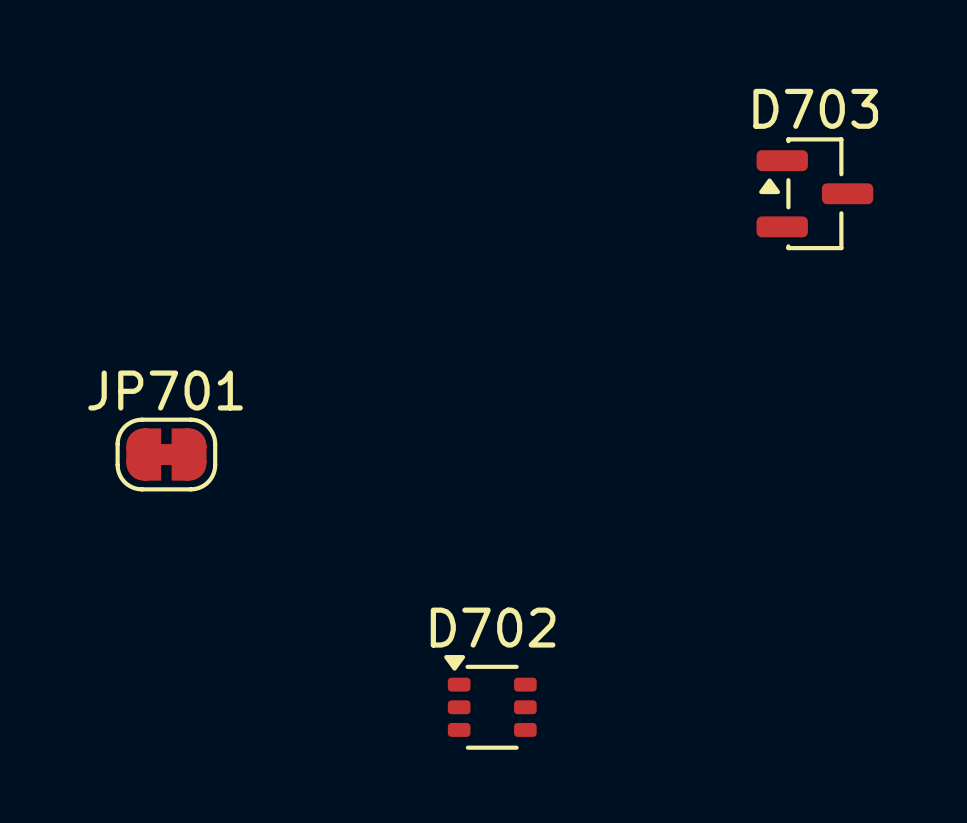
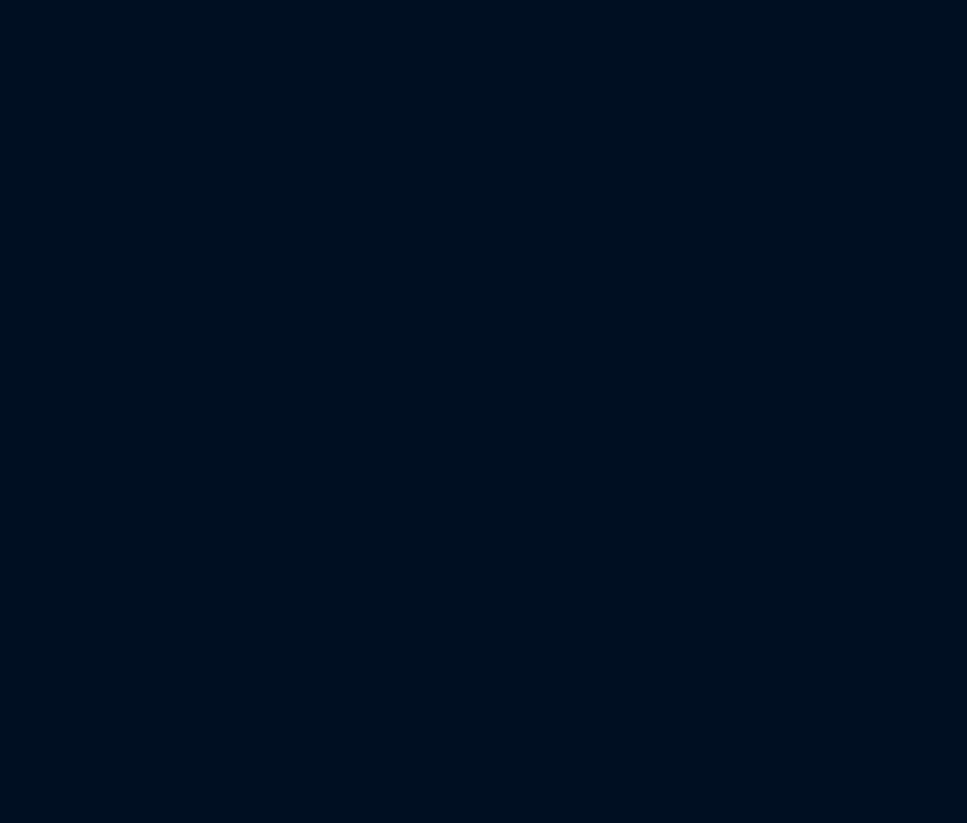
D703: (814, 193) -> none
JP701: (166, 454) -> none
D702: (490, 702) -> none

